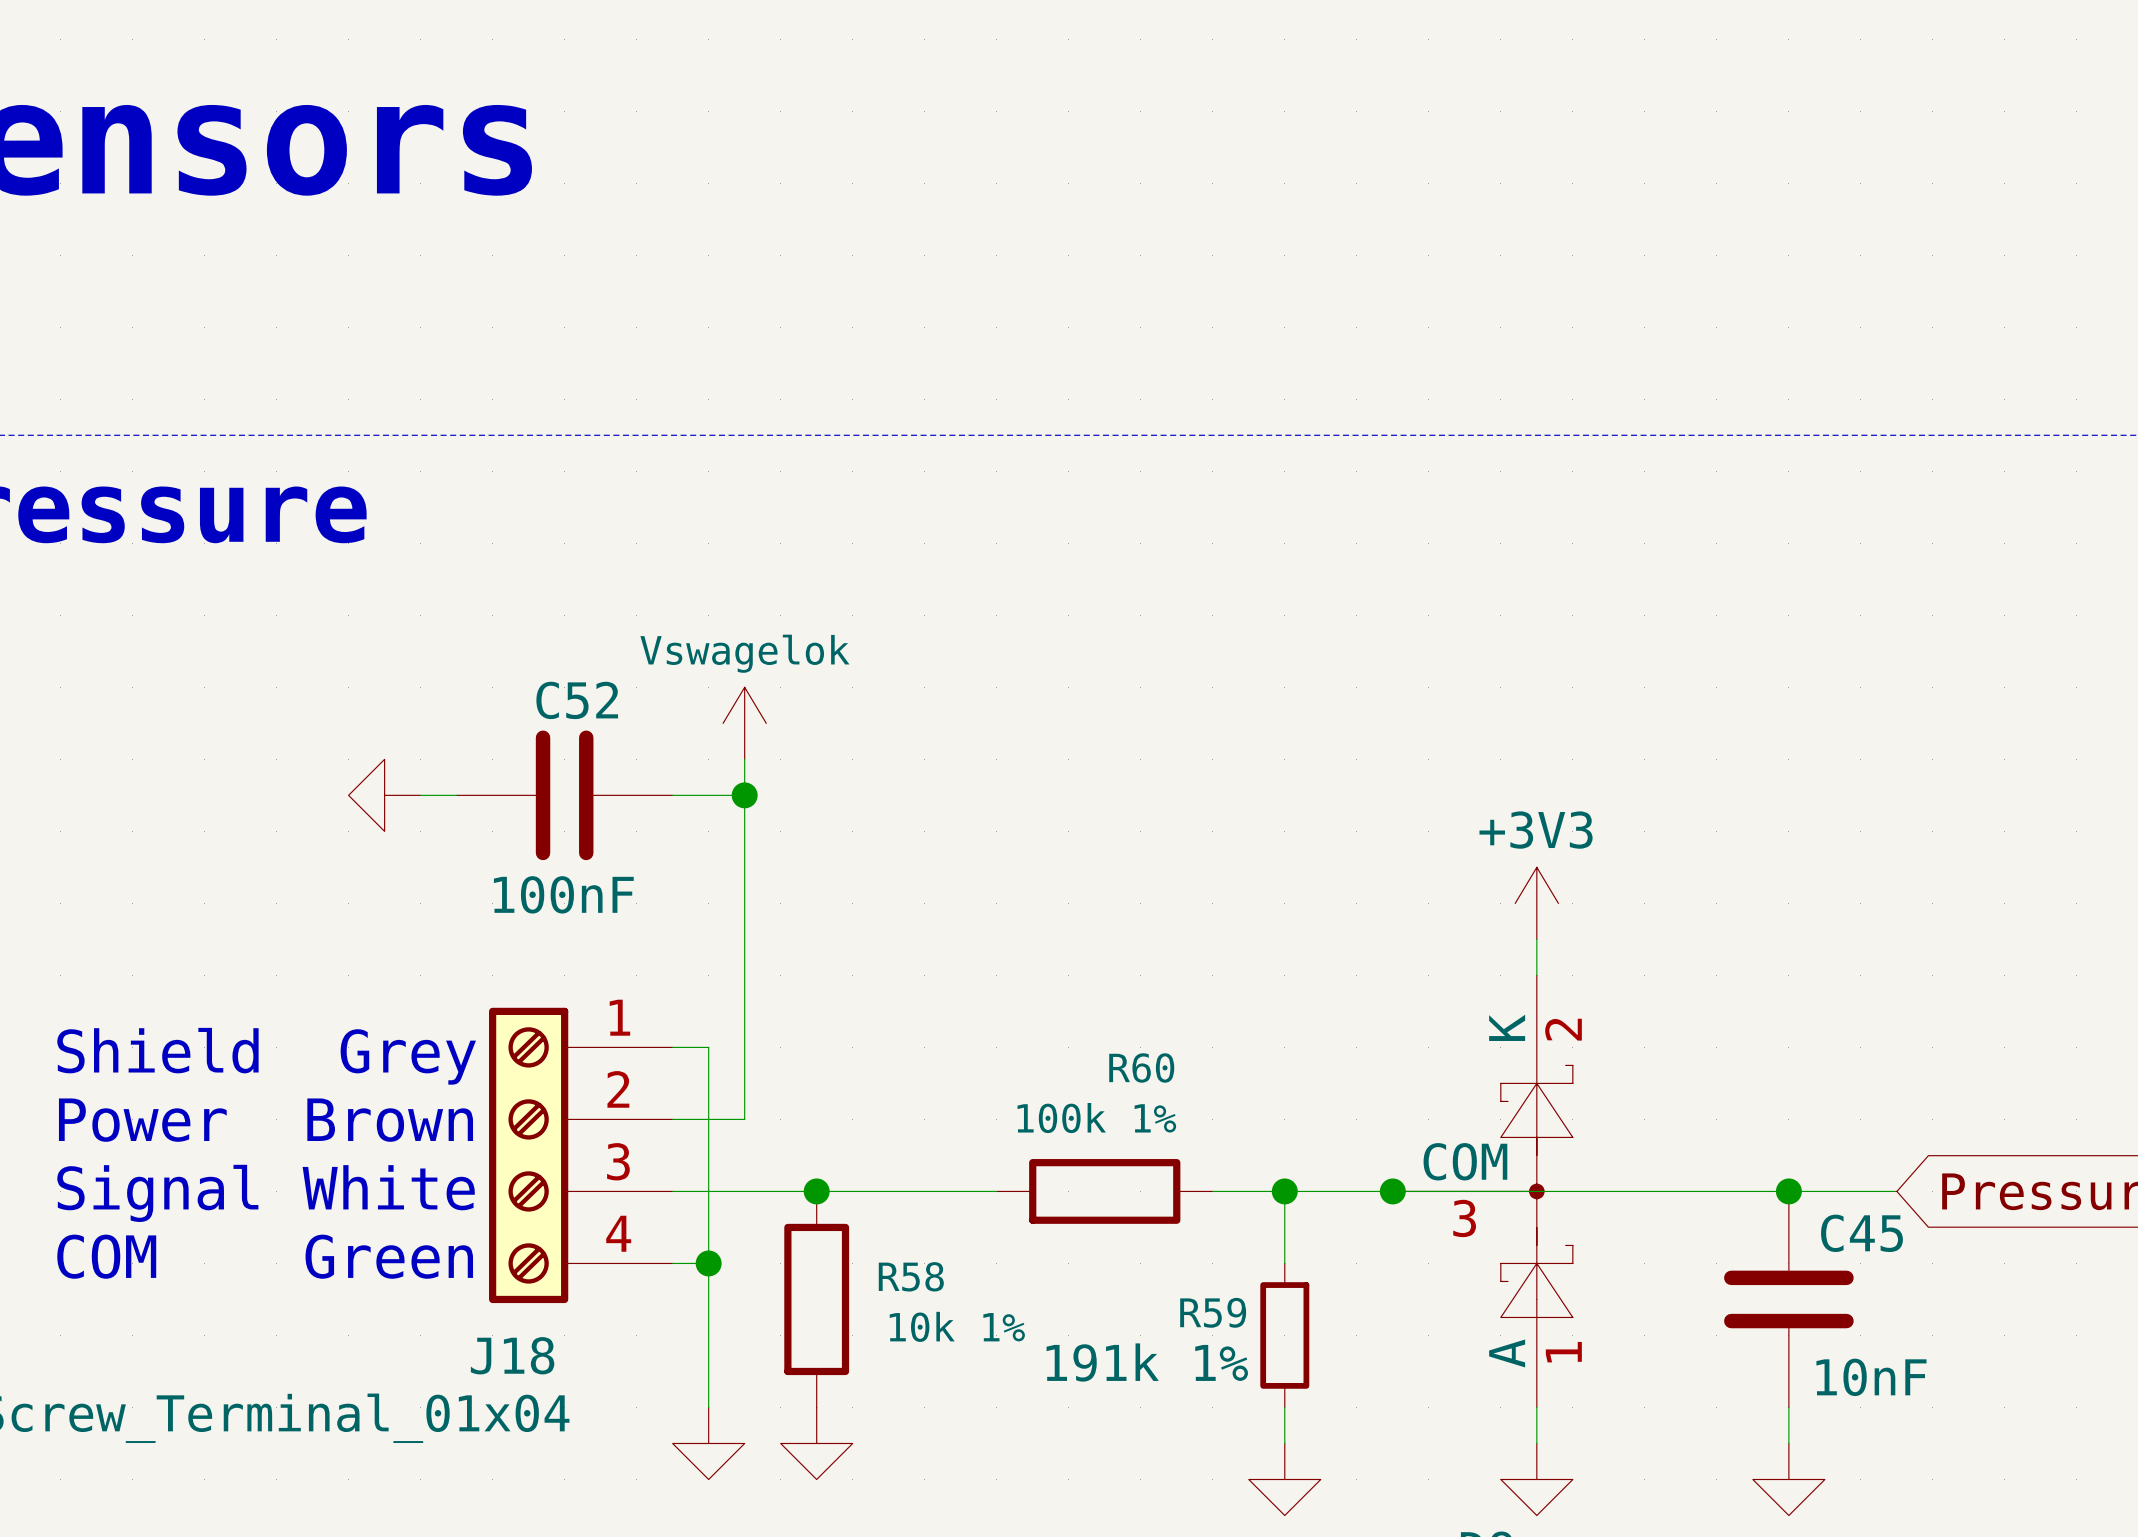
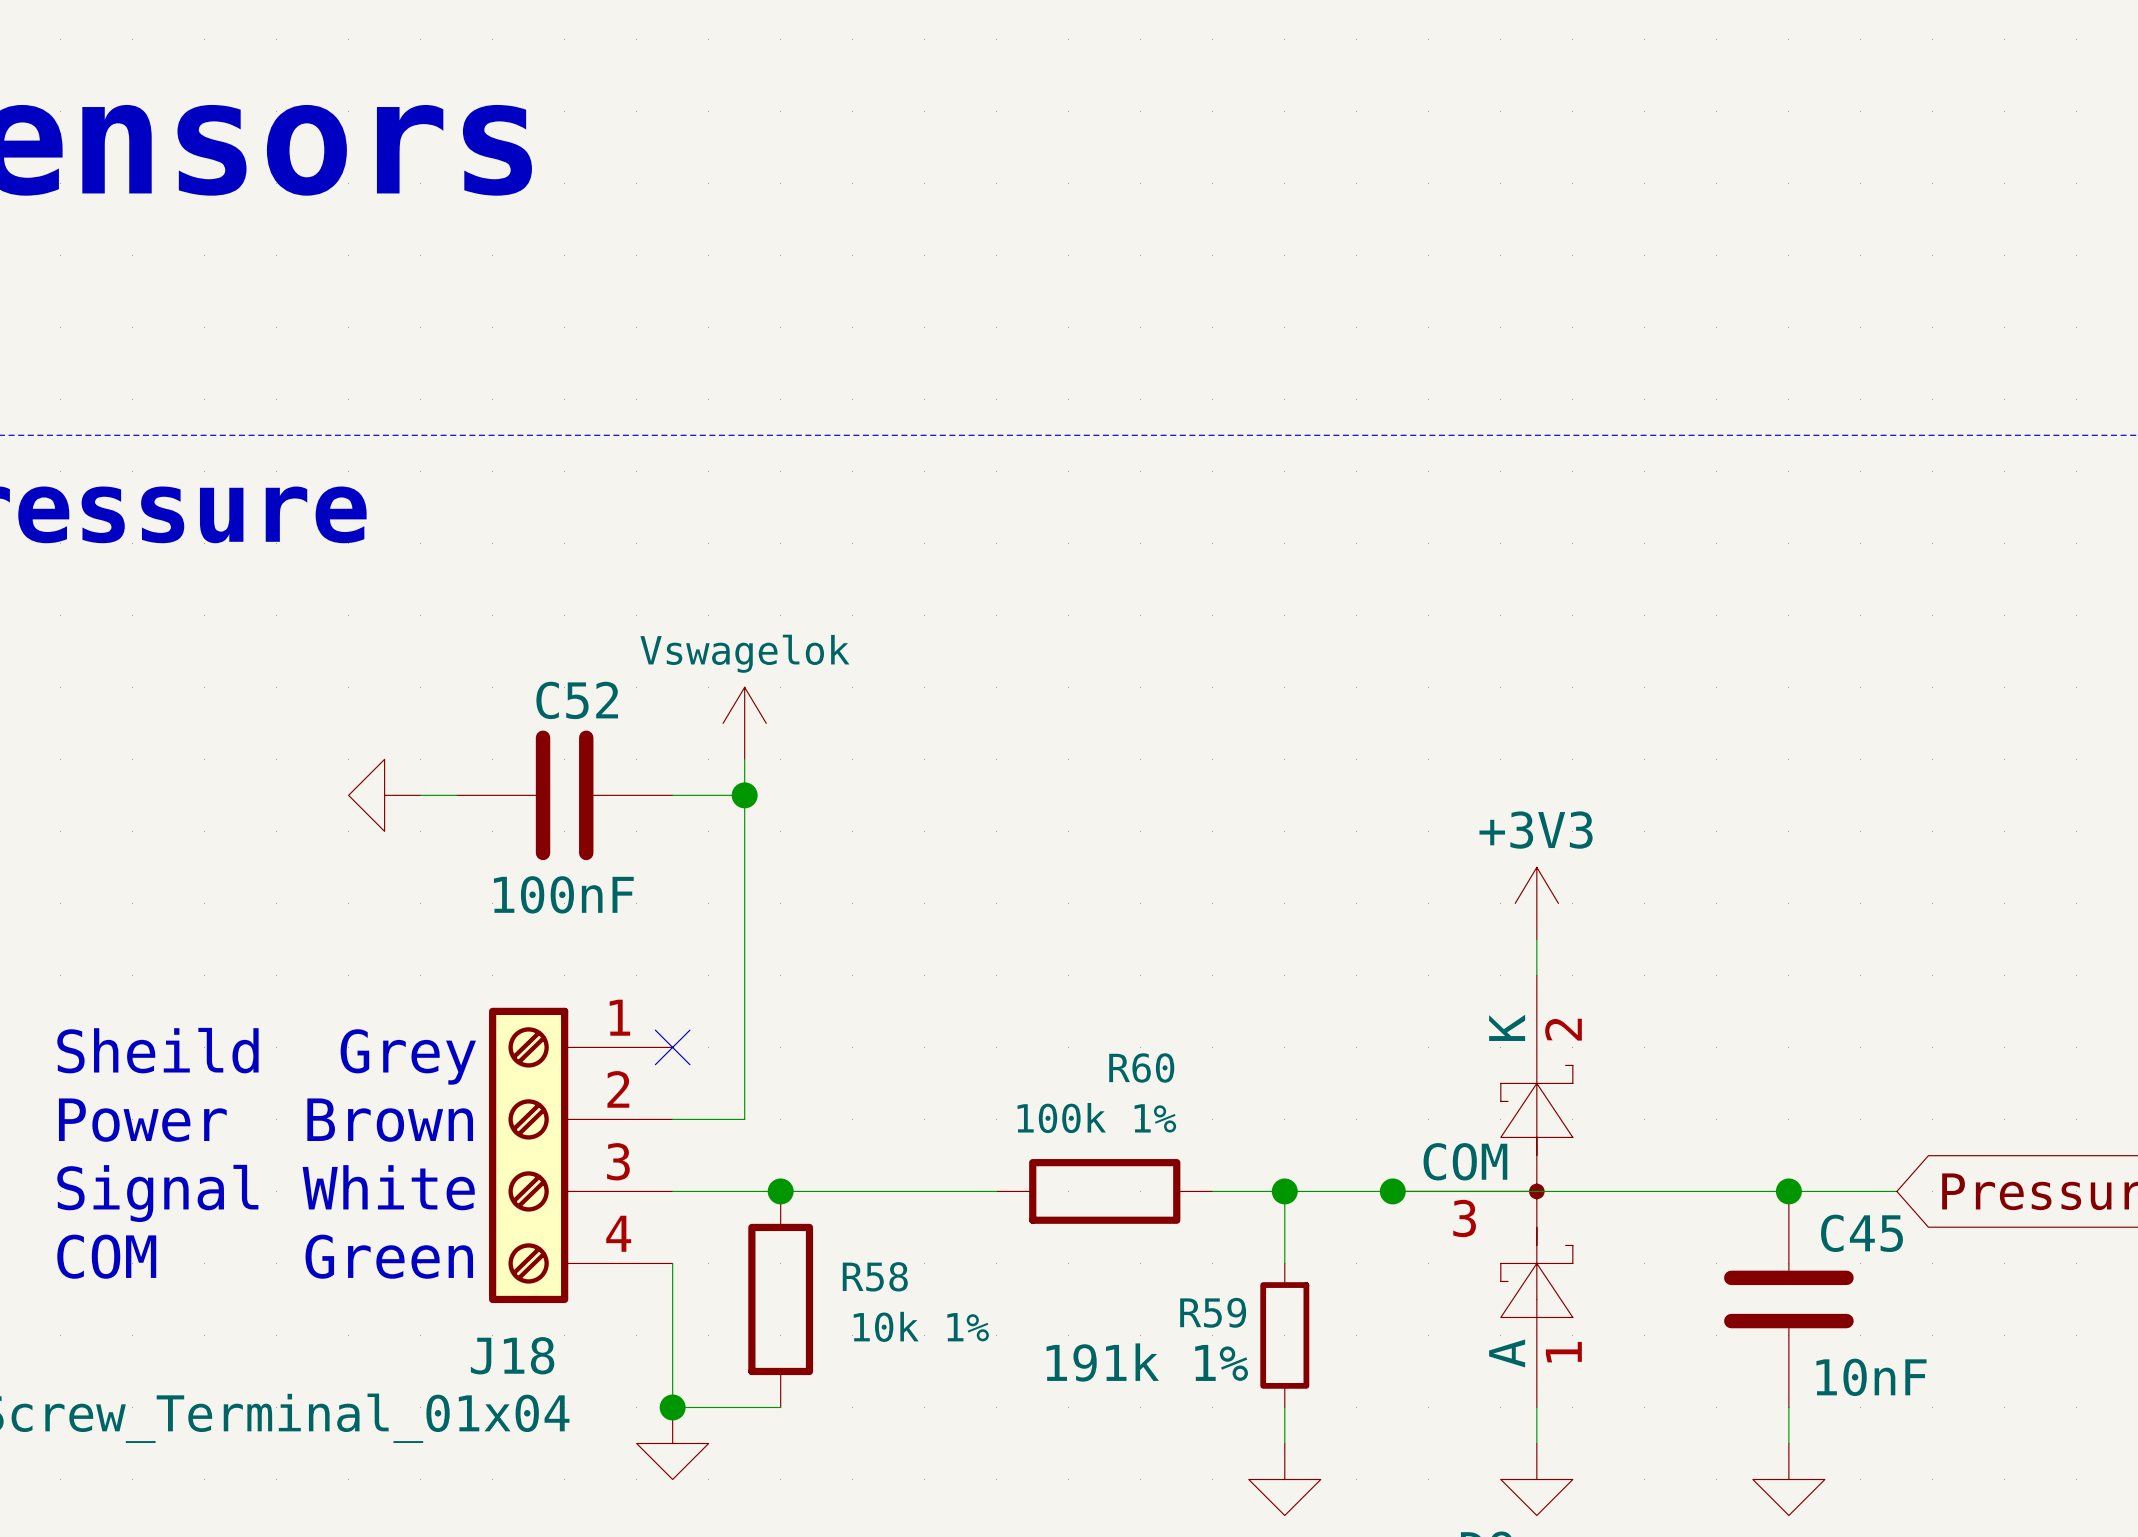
wire: (672, 1047) (708, 1047) (708, 1407) -> none
no-connect mark: none -> (672, 1047)
text: Shield (157, 1050) -> Sheild (157, 1050)
junction position: (816, 1191) -> (780, 1191)
wire: (672, 1263) (708, 1263) -> (672, 1263) (672, 1407) (780, 1407)
junction: (708, 1263) -> none
R58 position: (816, 1299) -> (780, 1299)
junction: none -> (672, 1407)
power symbol position: (708, 1443) -> (672, 1443)
power symbol: (816, 1443) -> none

